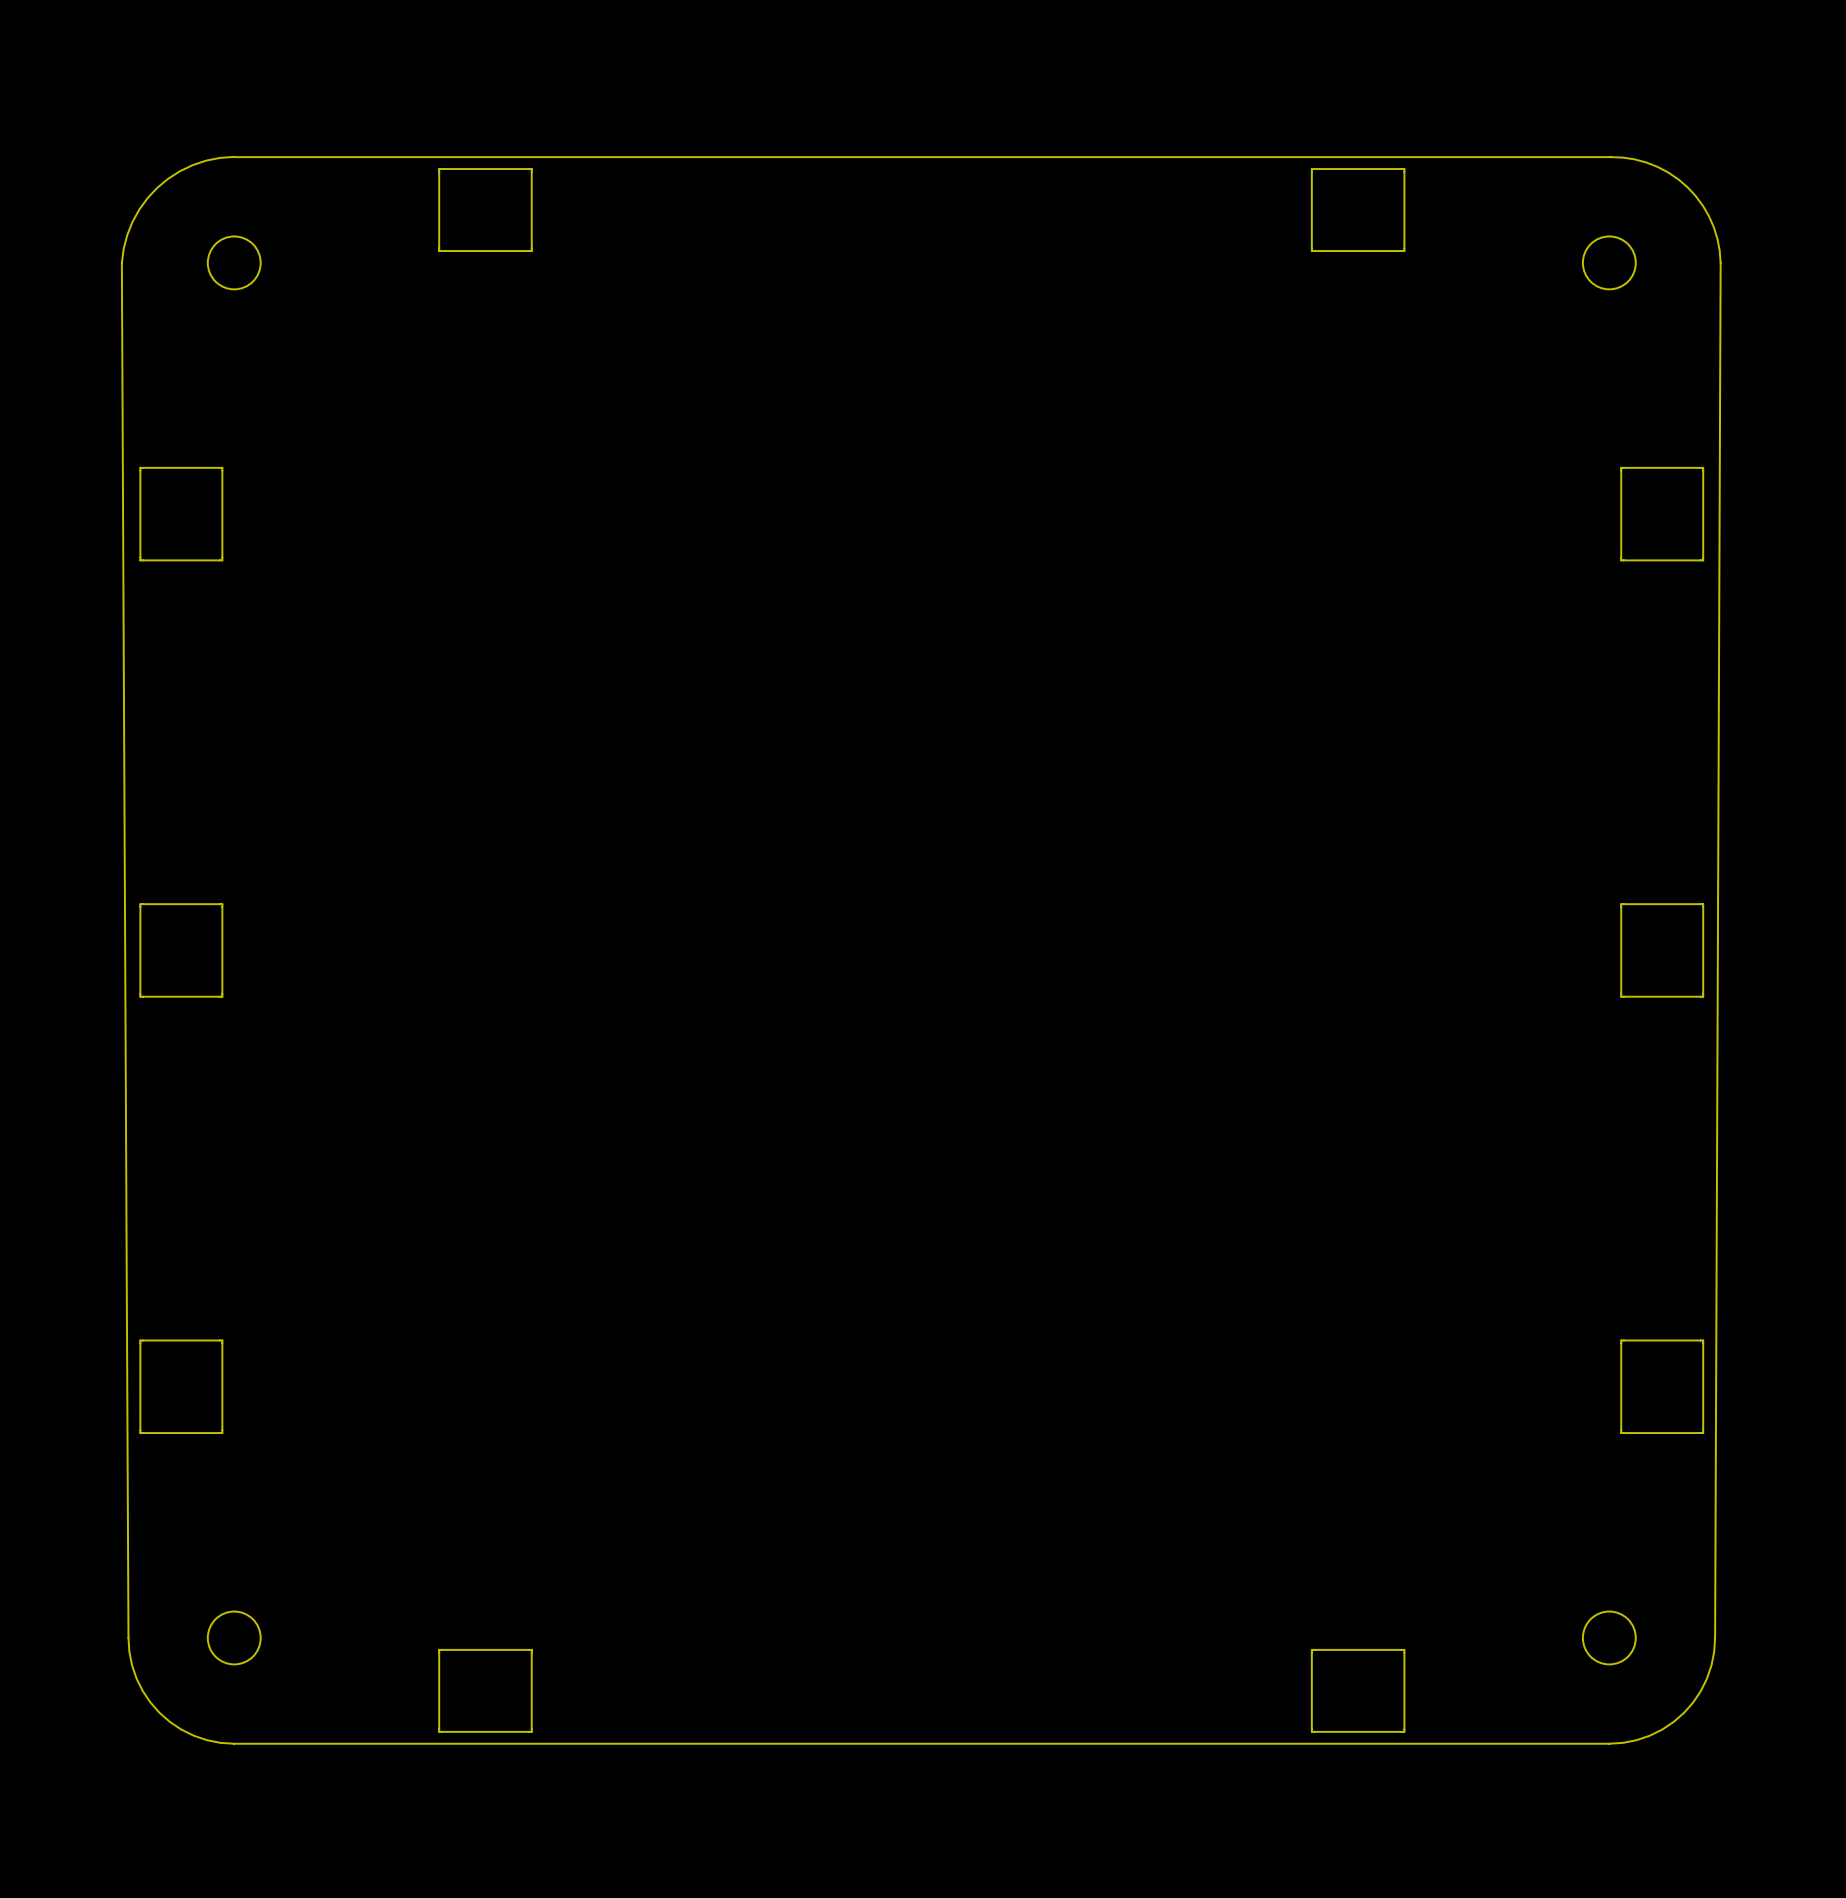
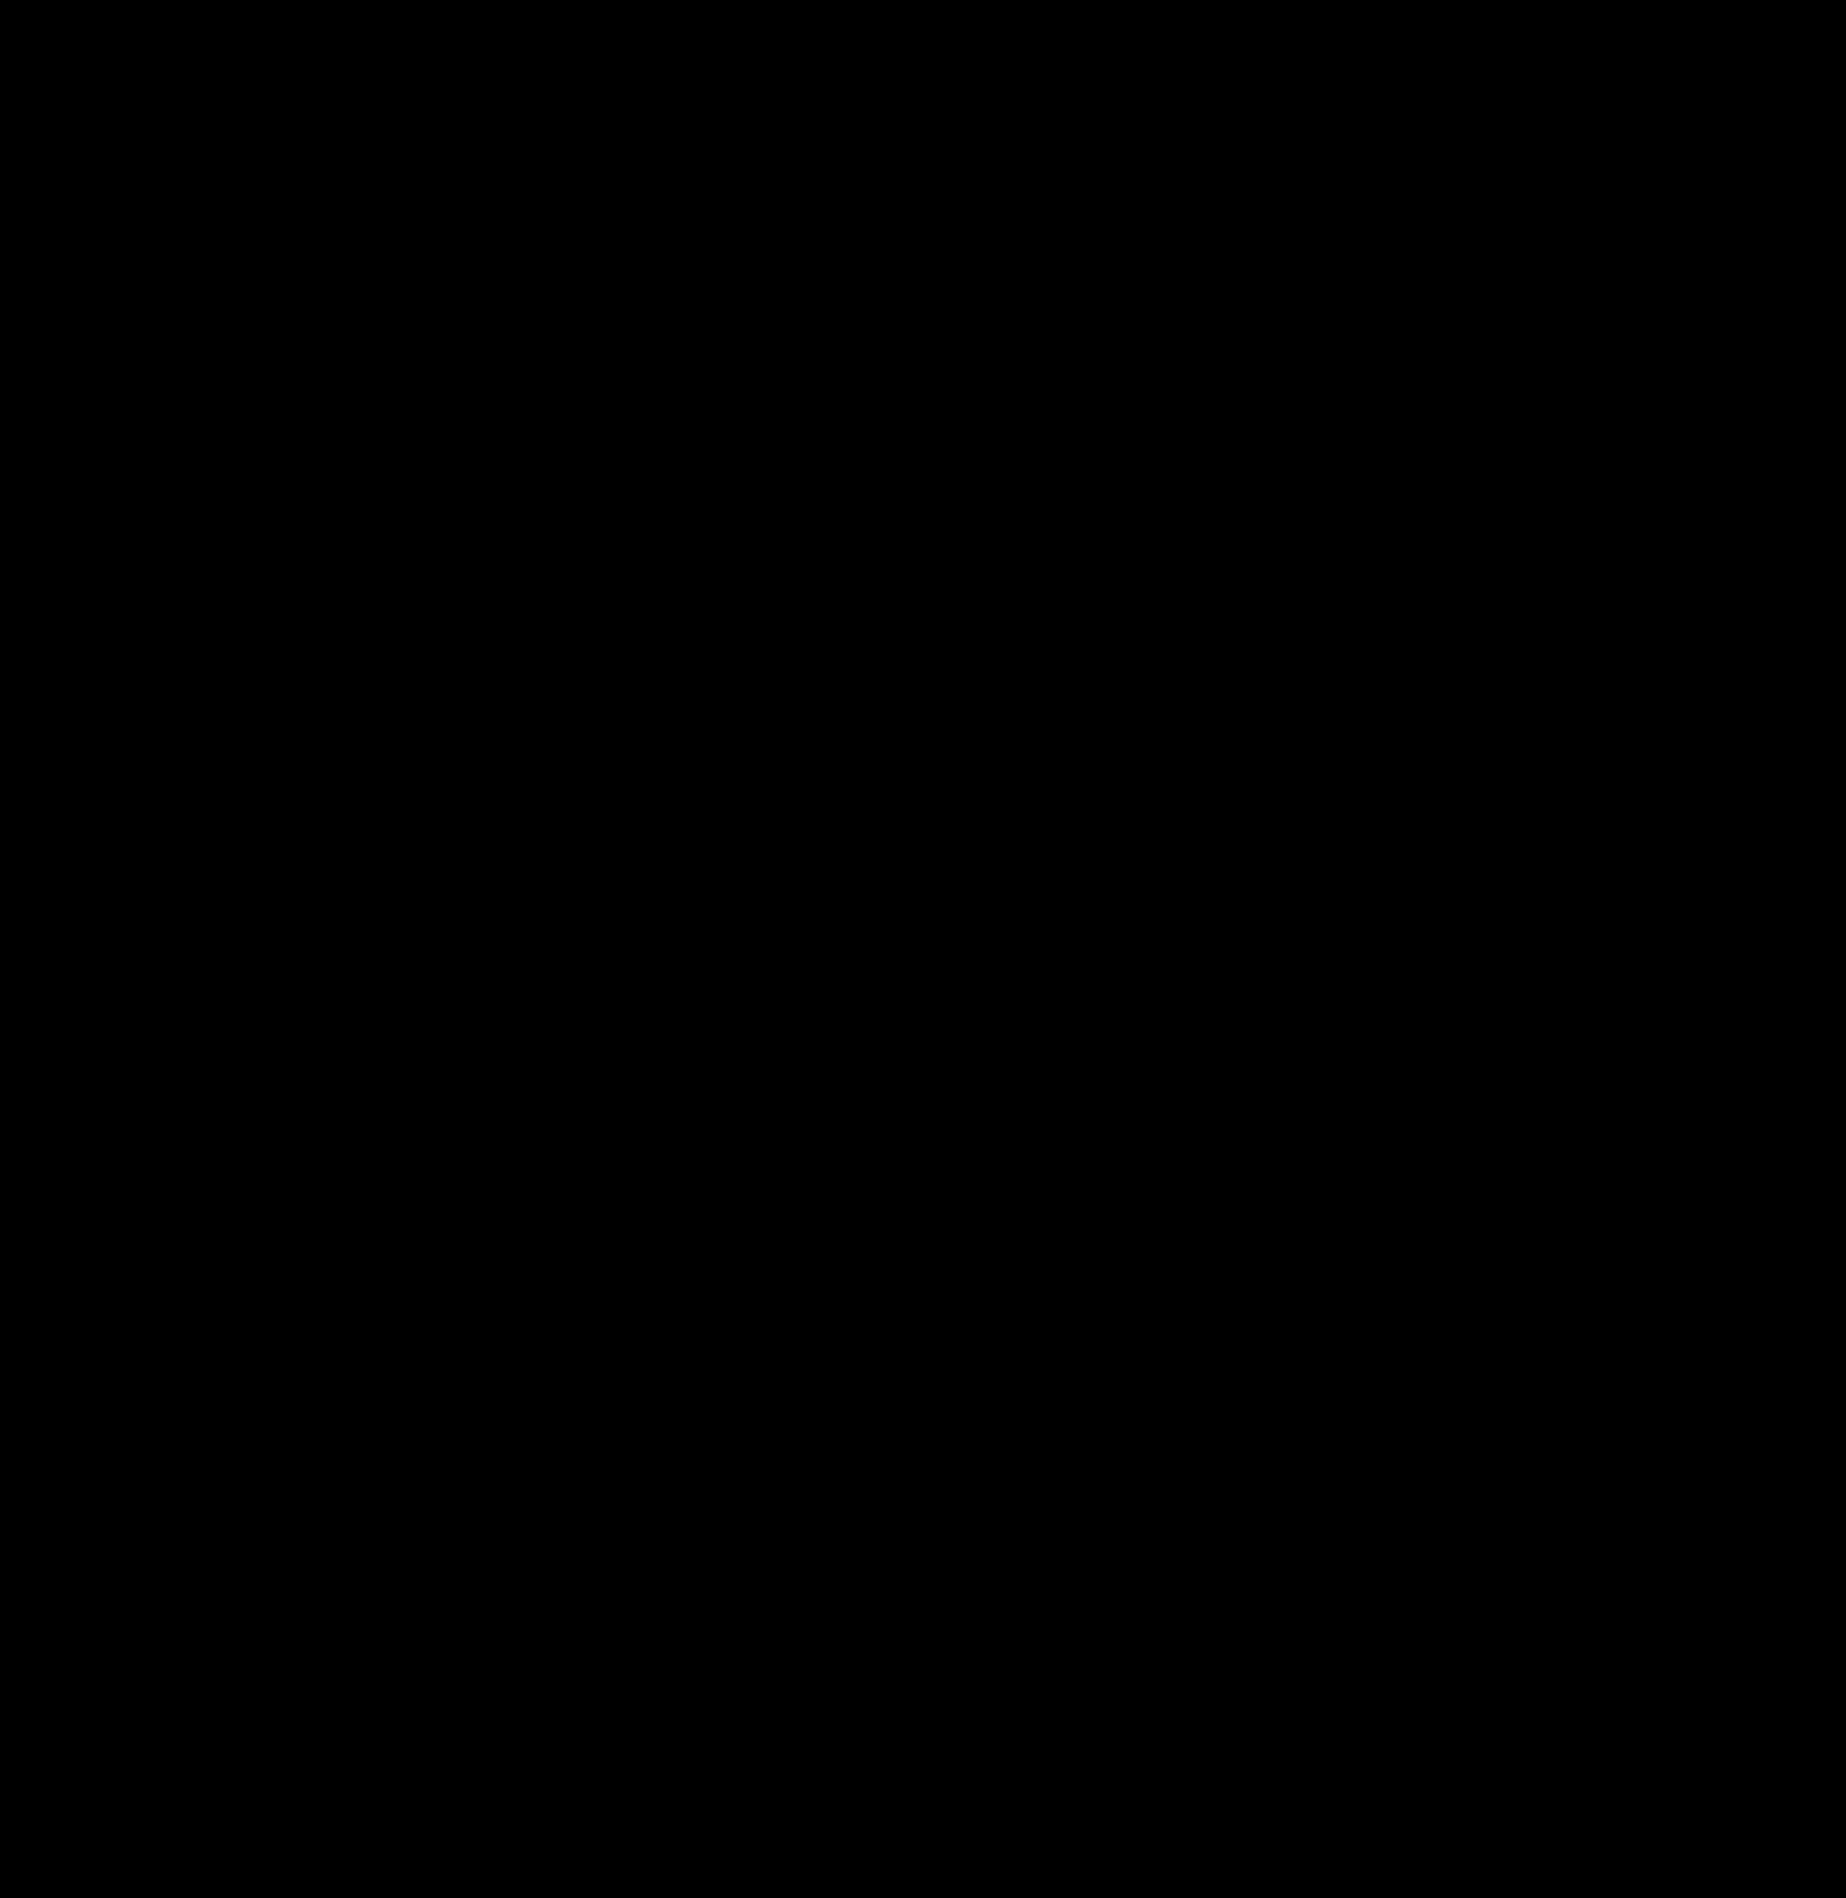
board edge: (234, 156) (220, 157) (192, 165) (168, 178) (157, 187) (147, 198) (132, 222) (127, 235) (121, 262) (128, 1637) (132, 1665) (136, 1678) (142, 1690) (159, 1712) (181, 1729) (193, 1735) (220, 1742) (234, 1743) (1609, 1743) (1623, 1742) (1649, 1735) (1673, 1721) (1684, 1712) (1693, 1702) (1707, 1678) (1711, 1665) (1715, 1637) (1720, 262) (1713, 227) (1702, 205) (1687, 187) (1657, 166) (1634, 159) (1610, 157) (234, 157) -> none
board edge: (439, 169) (439, 251) (531, 251) (531, 169) (439, 169) -> none
board edge: (1311, 169) (1404, 169) (1404, 251) (1311, 251) (1311, 169) -> none
round board edge: [207, 235, 262, 291] -> none
round board edge: [1582, 235, 1637, 291] -> none
board edge: (140, 467) (140, 560) (222, 560) (222, 467) (140, 467) -> none
board edge: (1621, 467) (1703, 467) (1703, 560) (1621, 560) (1621, 467) -> none
board edge: (140, 904) (140, 996) (222, 996) (222, 904) (140, 904) -> none
board edge: (1621, 904) (1621, 996) (1703, 996) (1703, 904) (1621, 904) -> none
board edge: (140, 1340) (140, 1433) (222, 1433) (222, 1340) (140, 1340) -> none
board edge: (1621, 1340) (1703, 1340) (1703, 1433) (1621, 1433) (1621, 1340) -> none
round board edge: [207, 1610, 262, 1666] -> none
round board edge: [1582, 1610, 1637, 1666] -> none
board edge: (439, 1649) (439, 1731) (531, 1731) (531, 1649) (439, 1649) -> none
board edge: (1311, 1649) (1404, 1649) (1404, 1731) (1311, 1731) (1311, 1649) -> none

